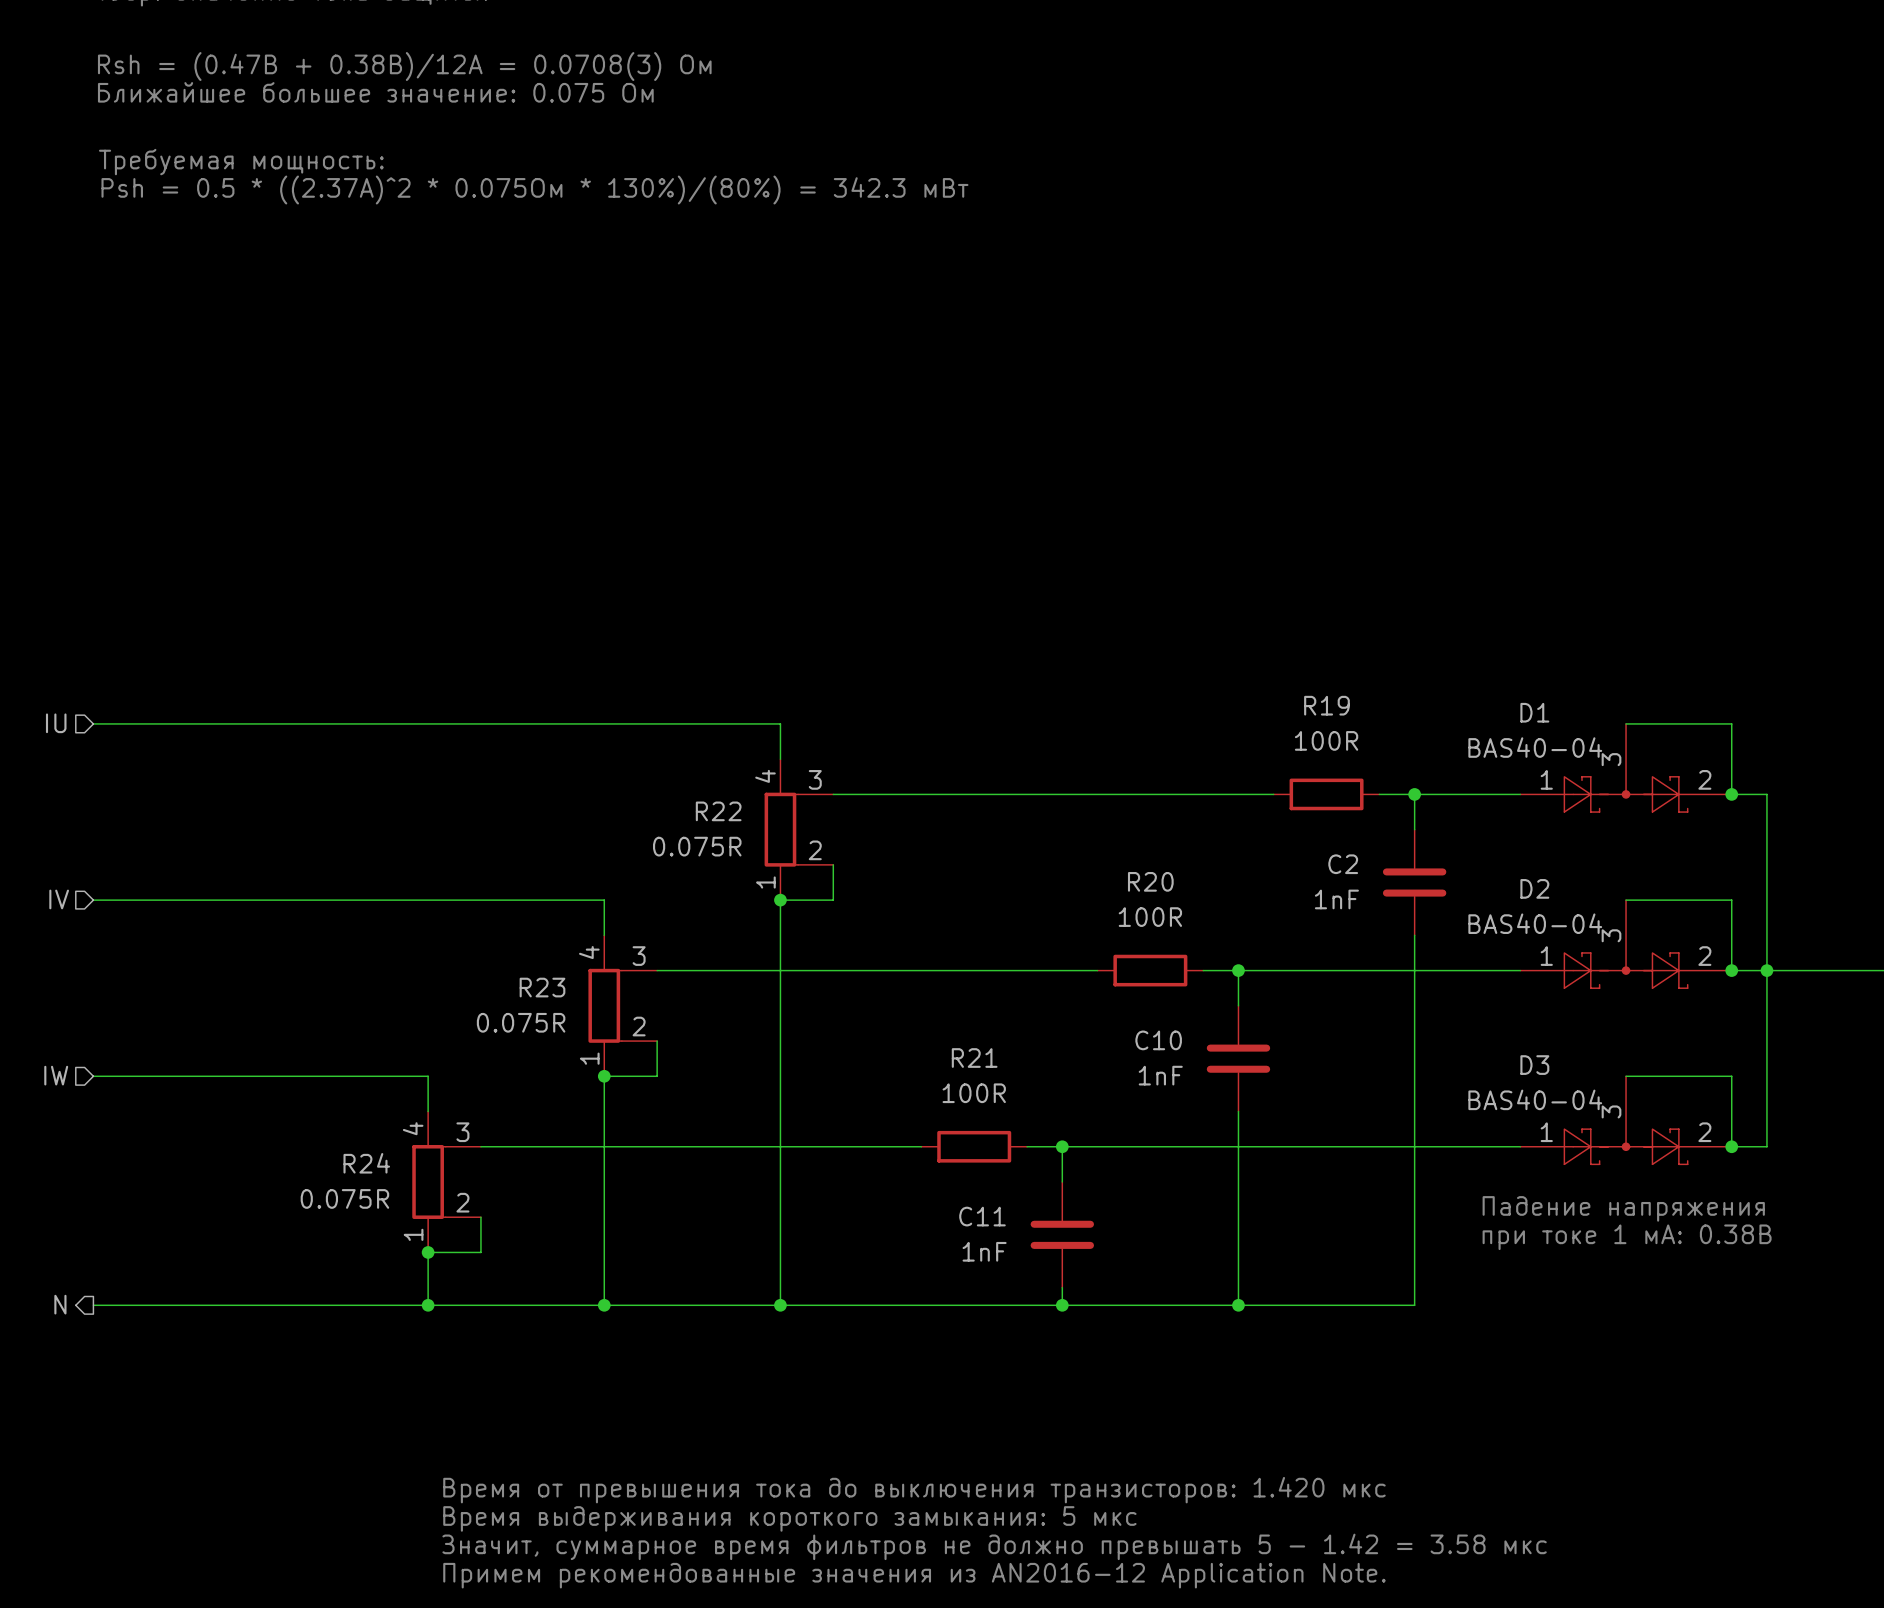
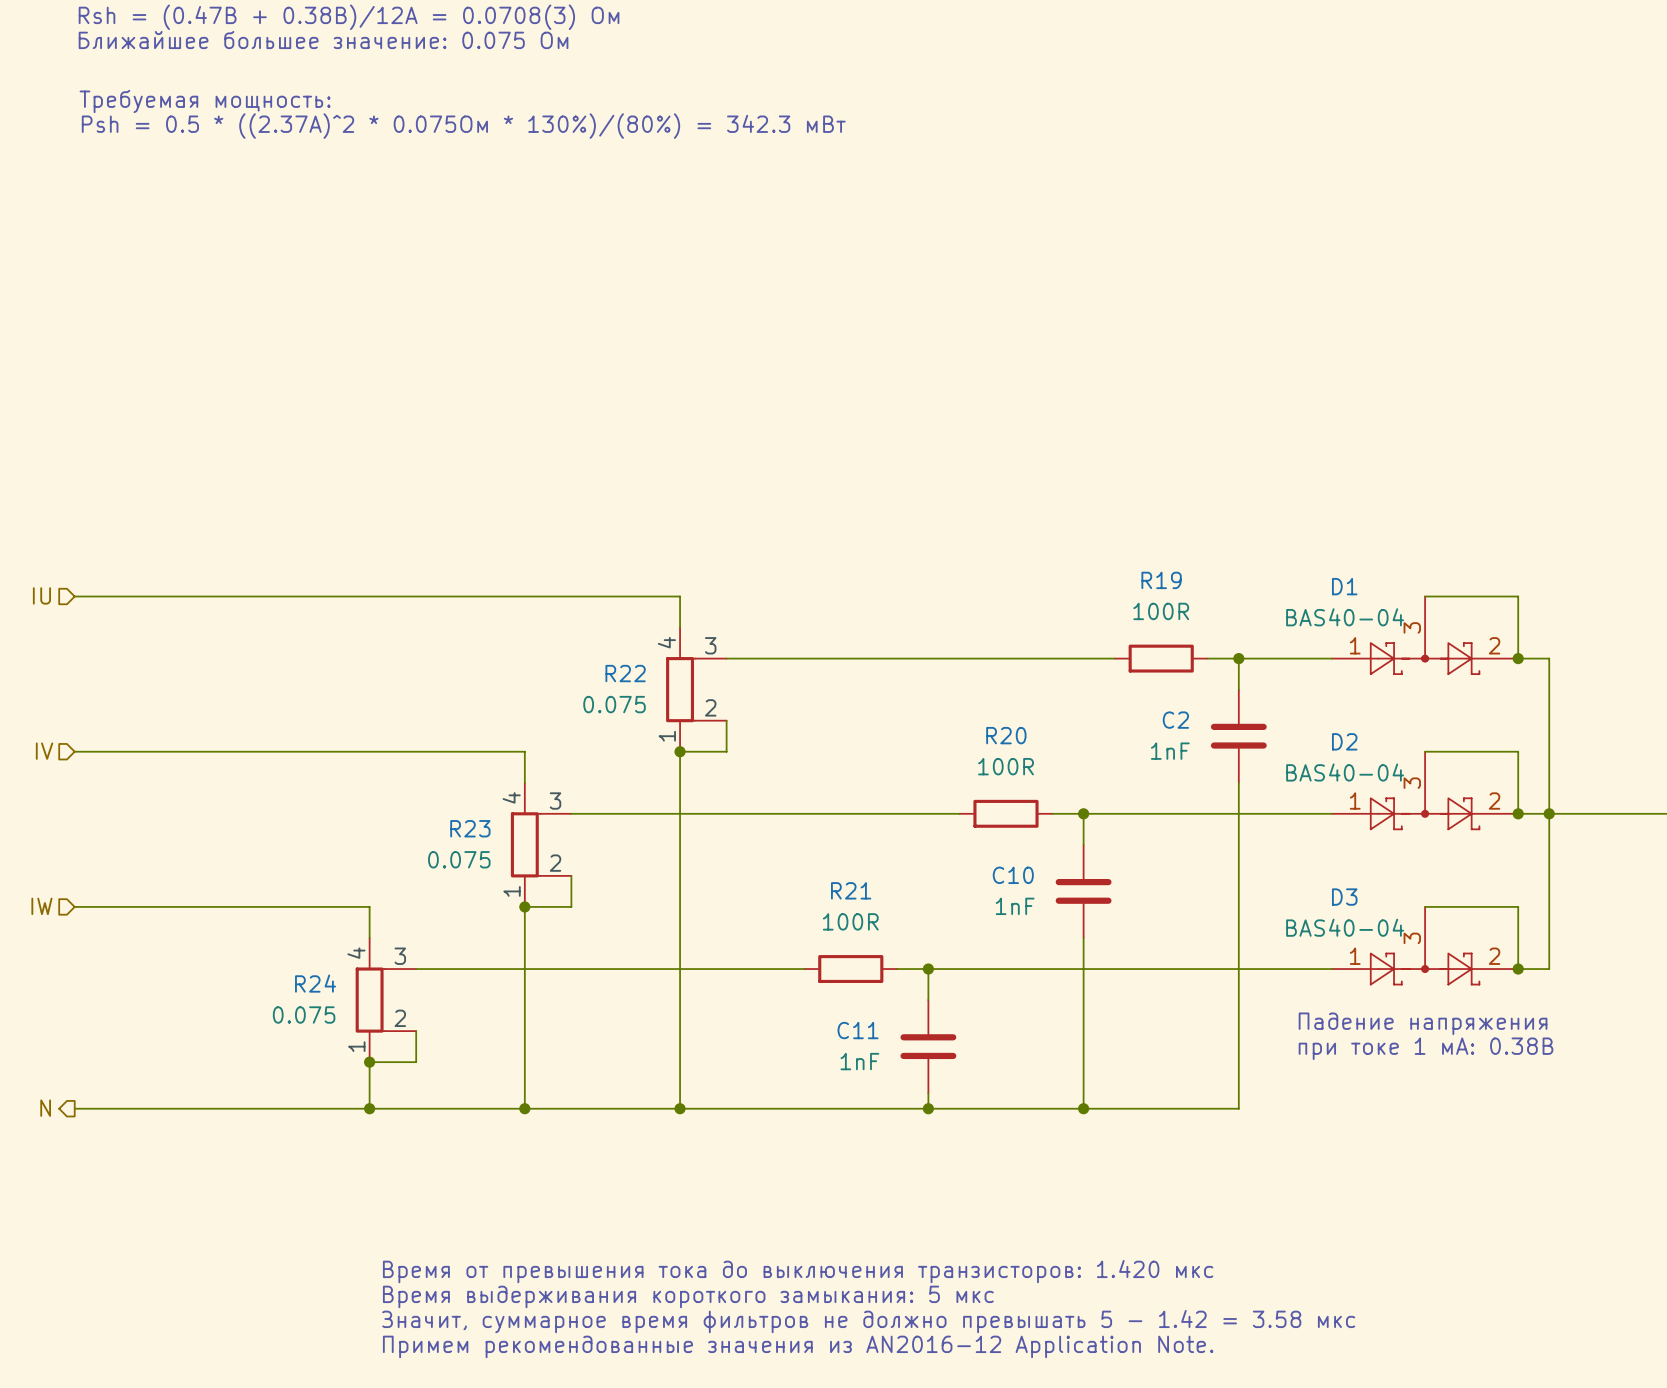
R22 value: 0.075R (697, 846) -> 0.075 (614, 704)
R23 value: 0.075R (521, 1022) -> 0.075 (459, 859)
R24 value: 0.075R (344, 1198) -> 0.075 (304, 1015)

